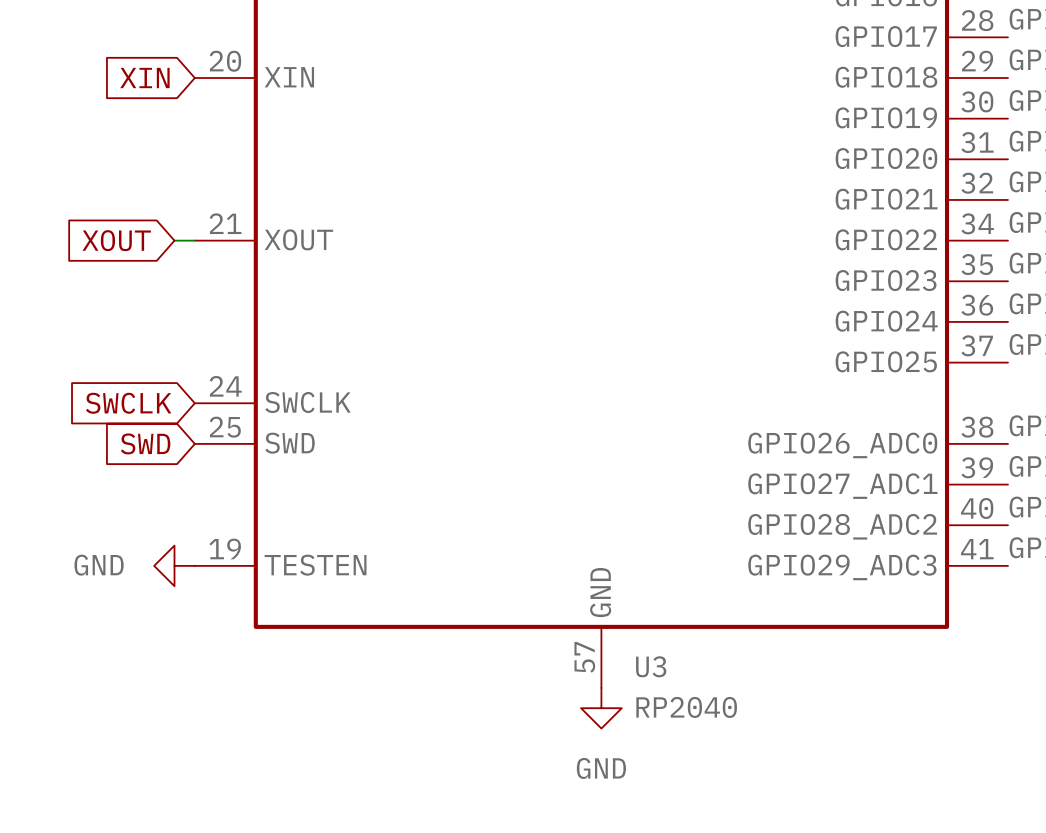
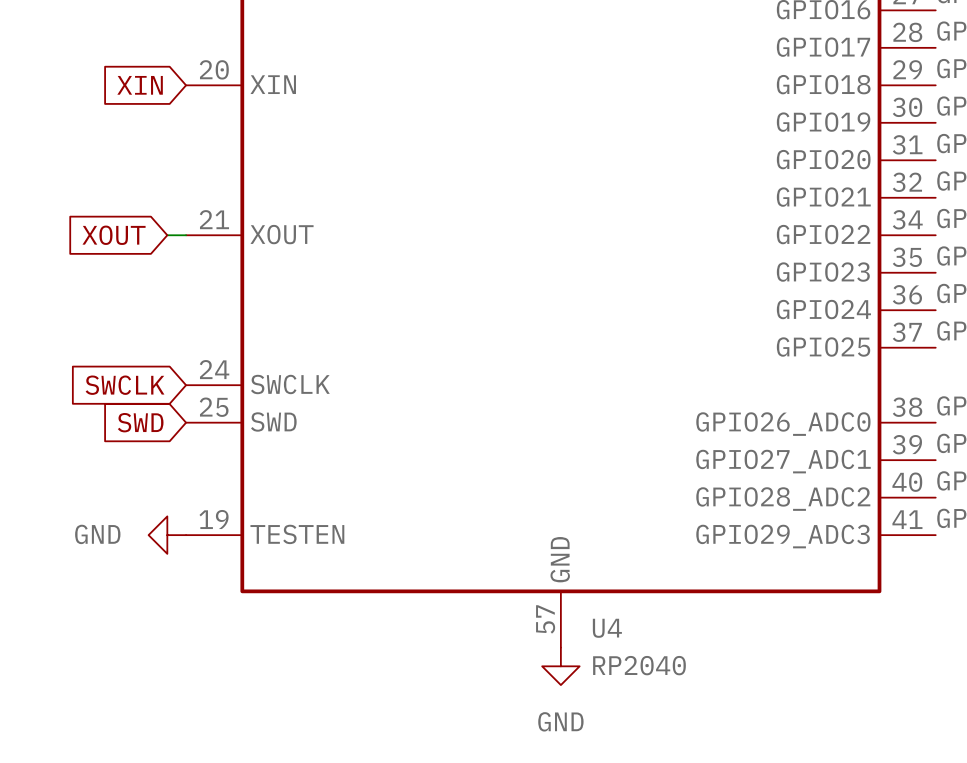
U3 name: U3 (651, 666) -> U4 (607, 628)

